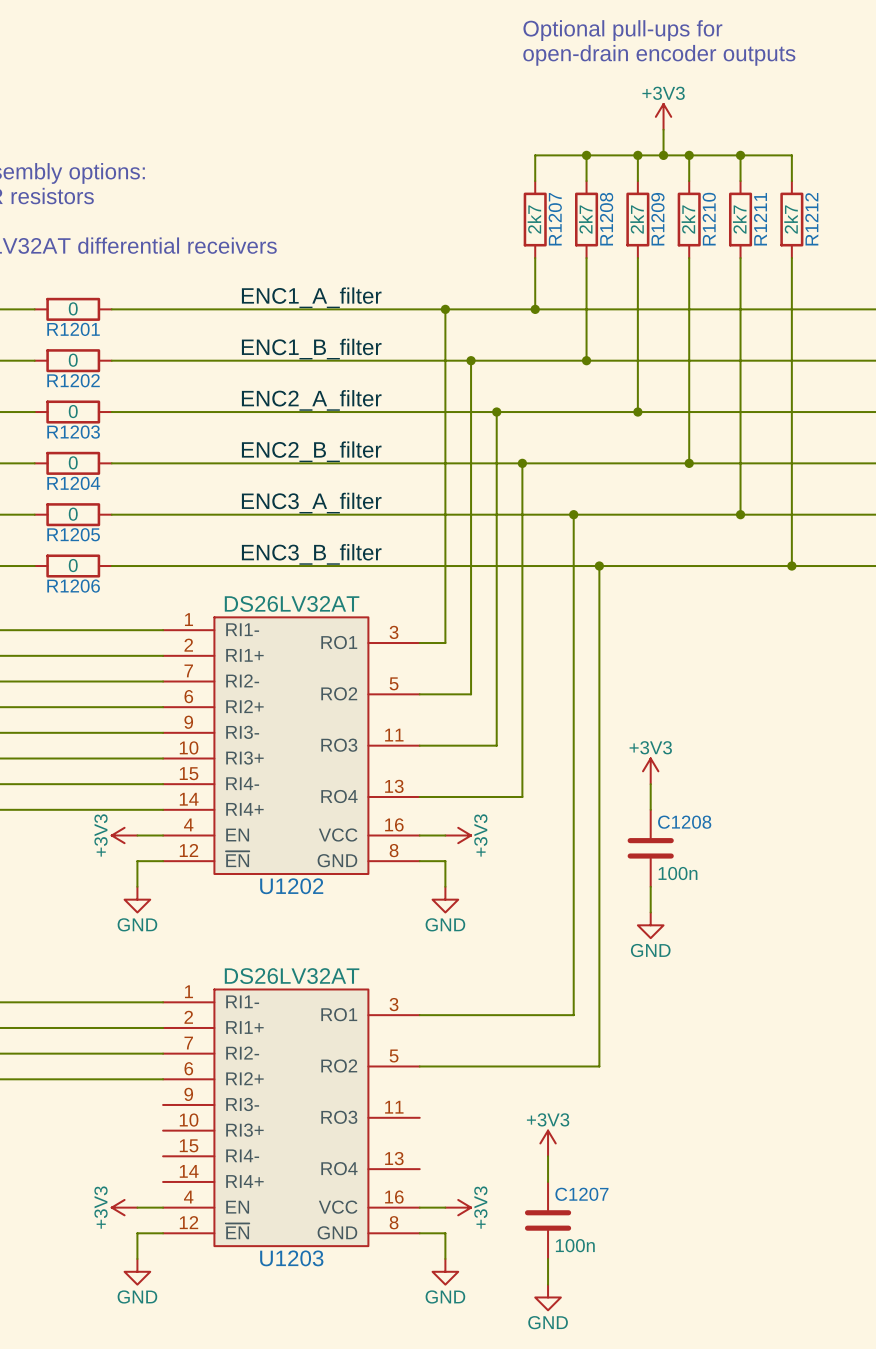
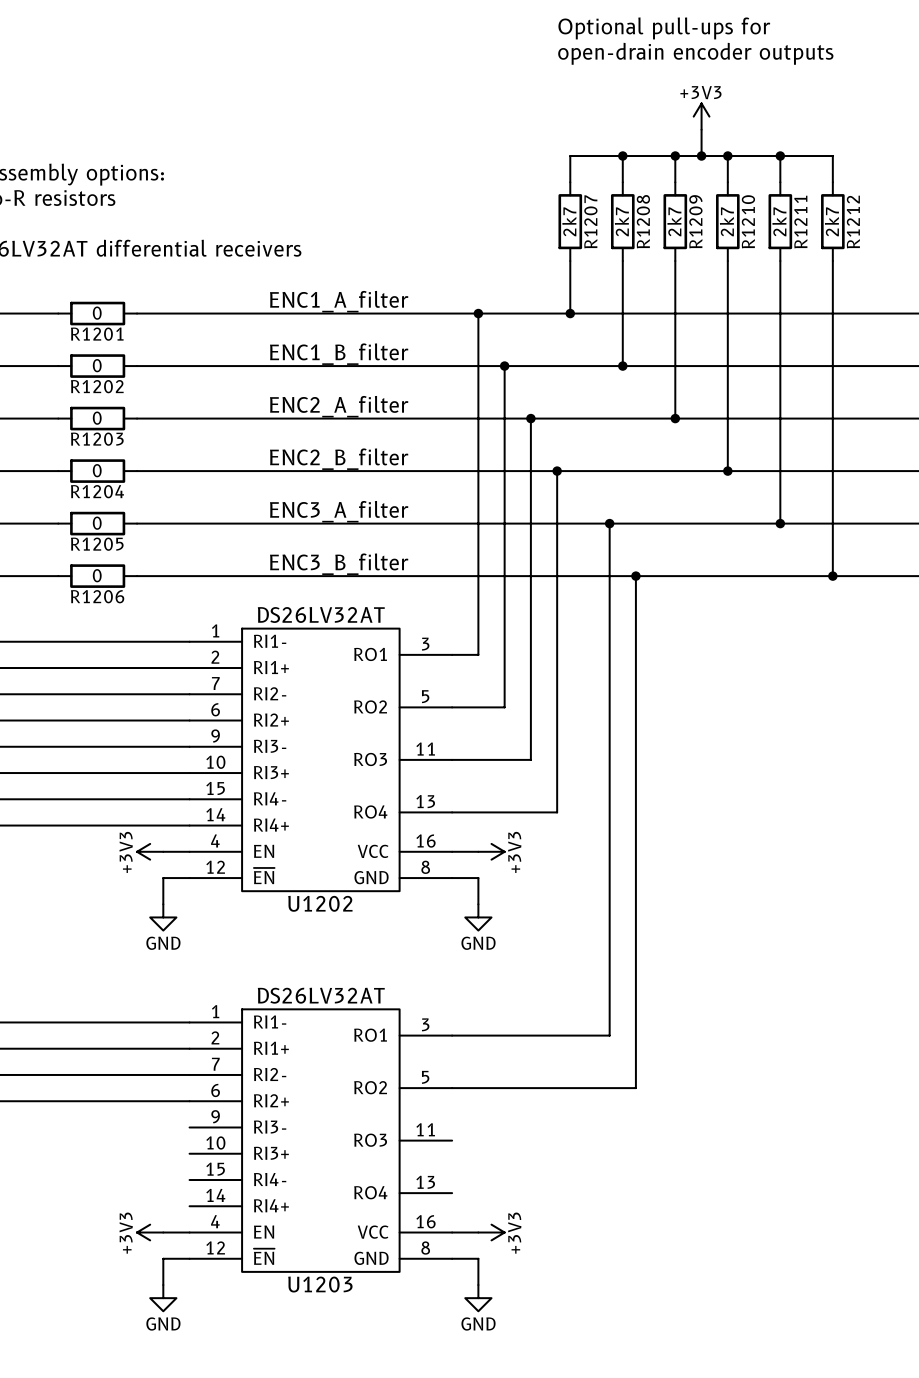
power symbol: +3V3 (650, 771) -> none
wire: (650, 784) (650, 809) -> none
C1208: 100n (650, 848) -> none
wire: (650, 886) (650, 912) -> none
power symbol: GND (650, 925) -> none
power symbol: +3V3 (548, 1143) -> none
wire: (548, 1156) (548, 1181) -> none
C1207: 100n (548, 1220) -> none
wire: (548, 1258) (548, 1284) -> none
power symbol: GND (548, 1297) -> none

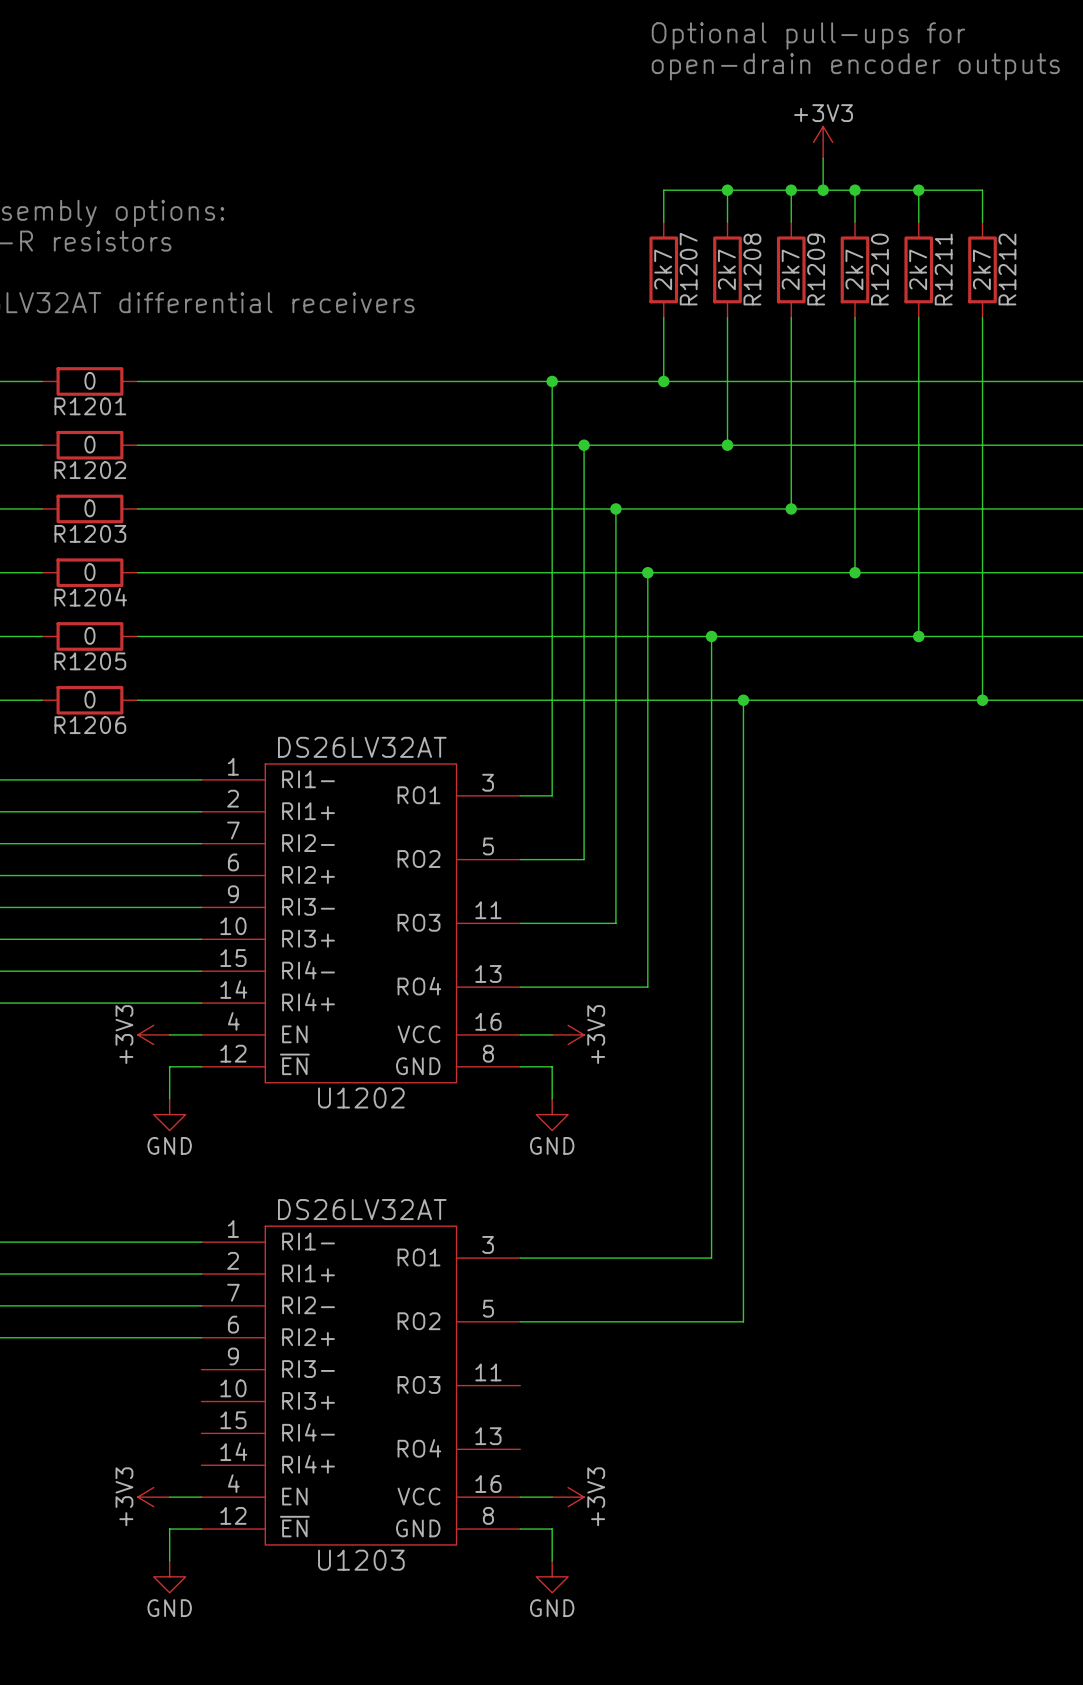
label: ENC1_A_filter (339, 301) -> none
label: ENC1_B_filter (339, 354) -> none
label: ENC2_A_filter (339, 406) -> none
label: ENC2_B_filter (339, 459) -> none
label: ENC3_A_filter (339, 511) -> none
label: ENC3_B_filter (339, 564) -> none

